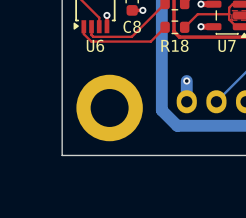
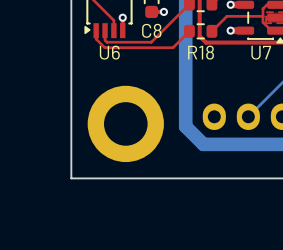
bottom track: (186, 81) (186, 102) -> none
via: (186, 81) -> none

